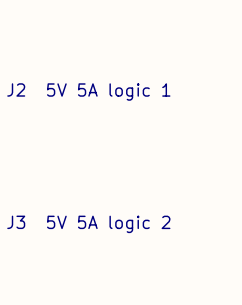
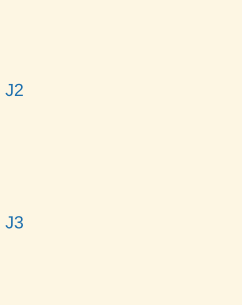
text: 5V 5A logic 1 (108, 92) -> none
text: 5V 5A logic 2 (108, 224) -> none

